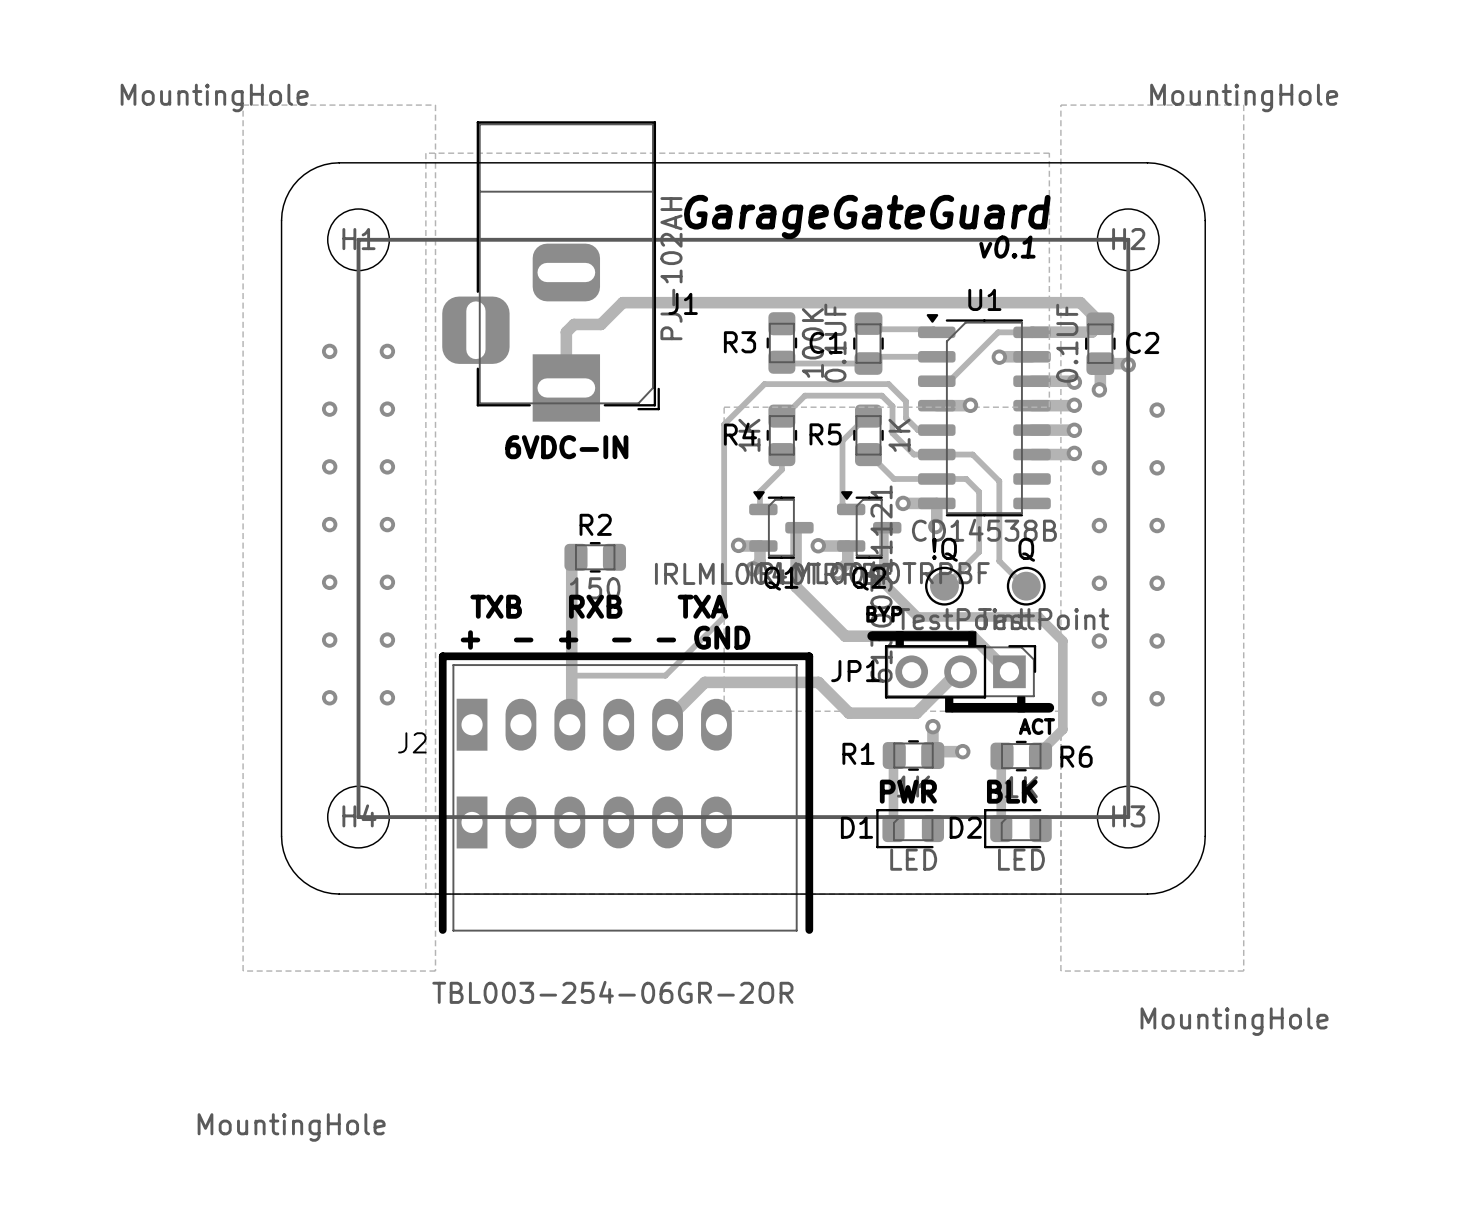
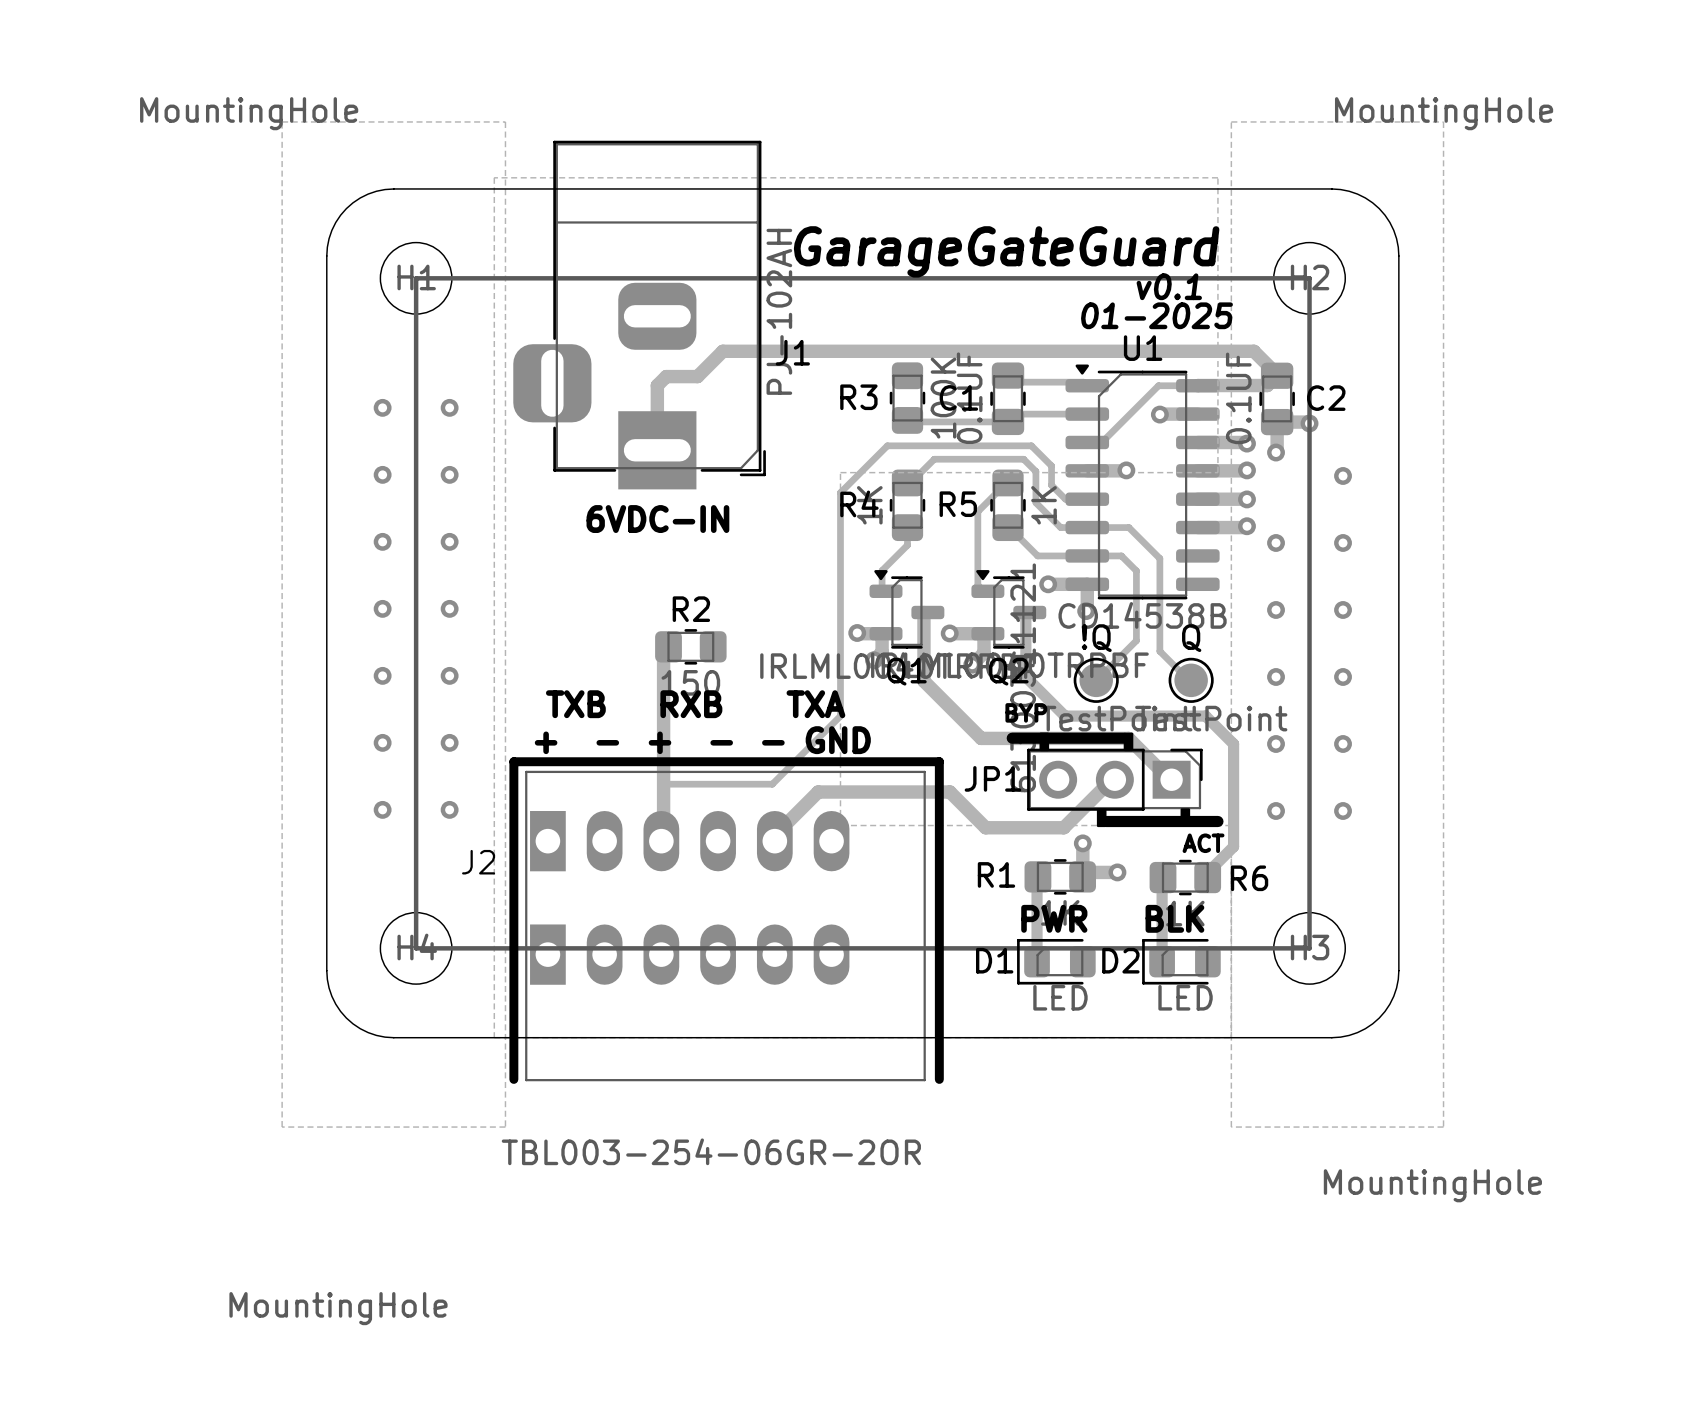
text: none -> 01-2025 (1156, 315)

